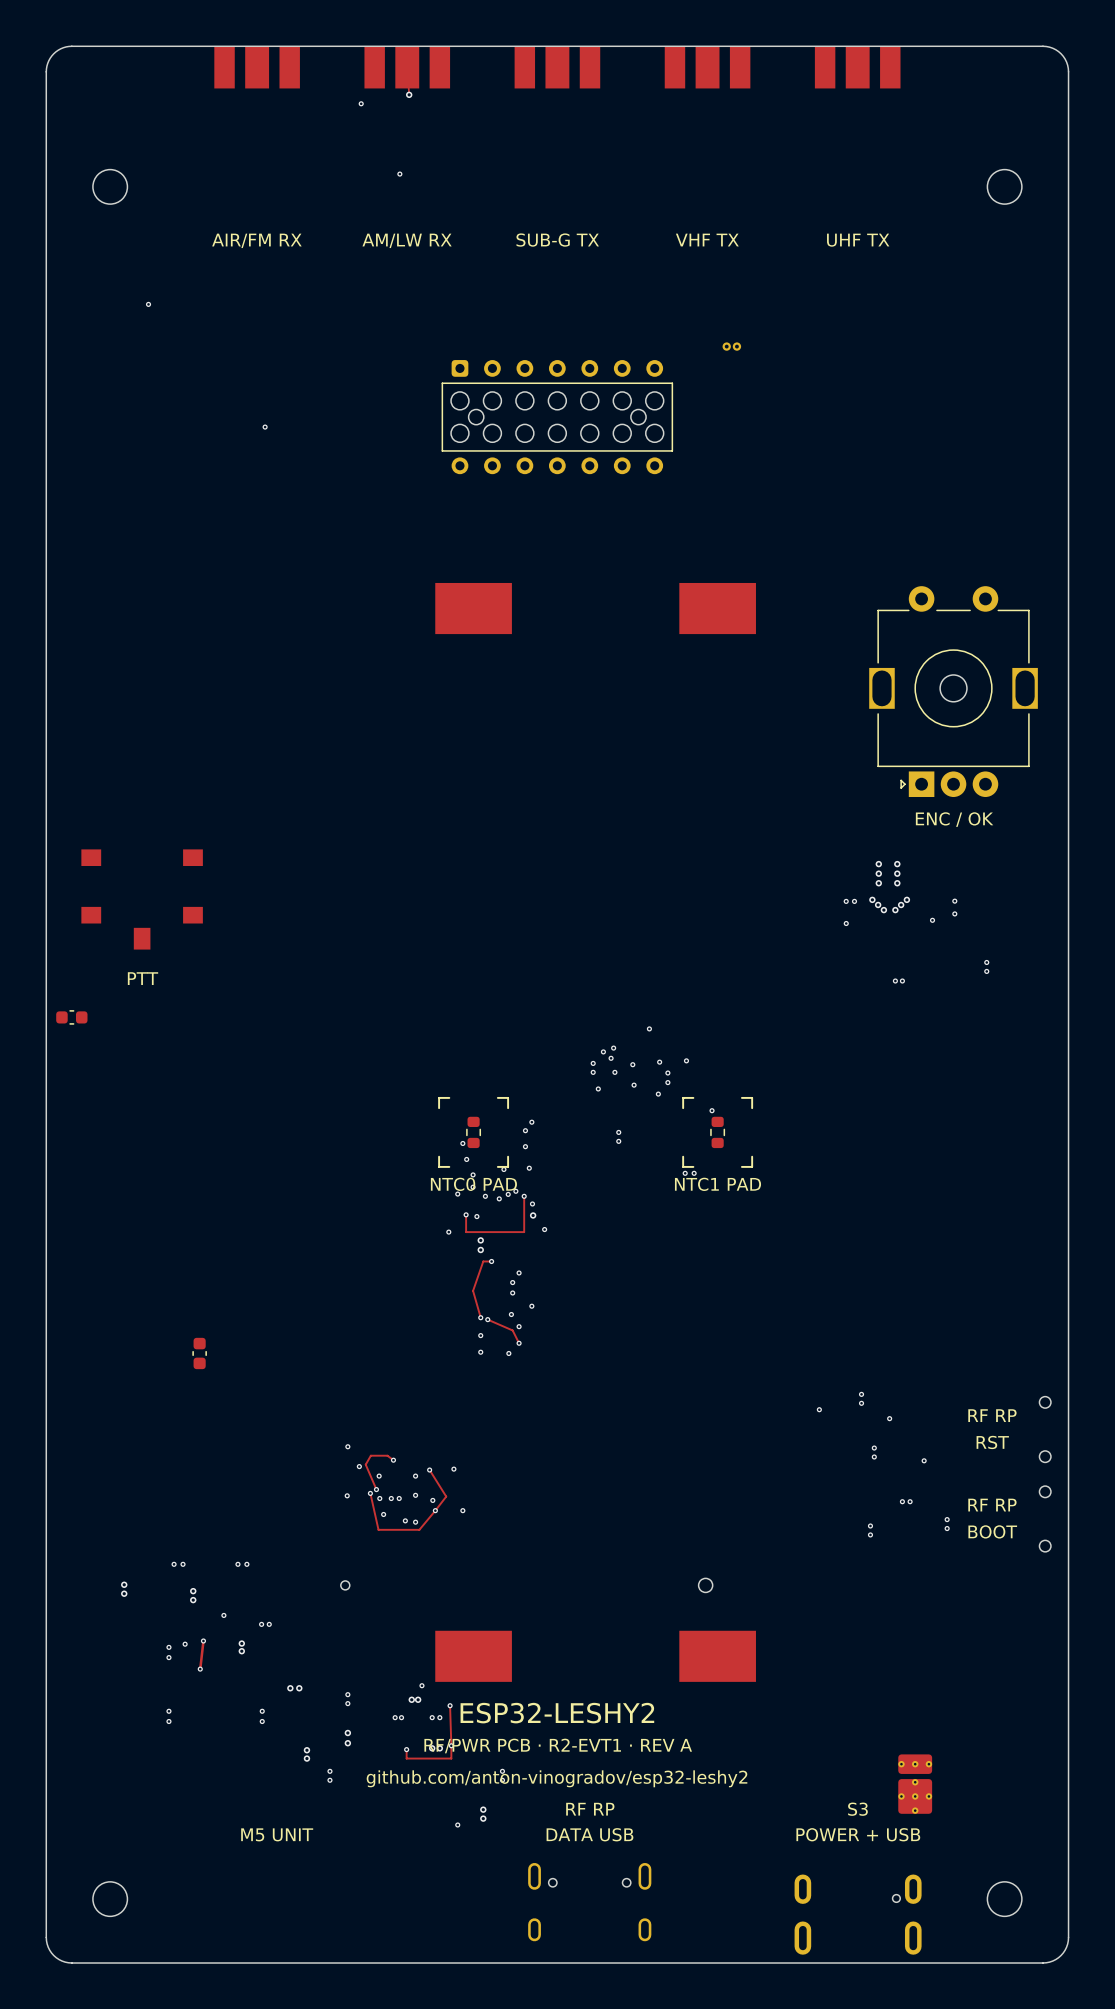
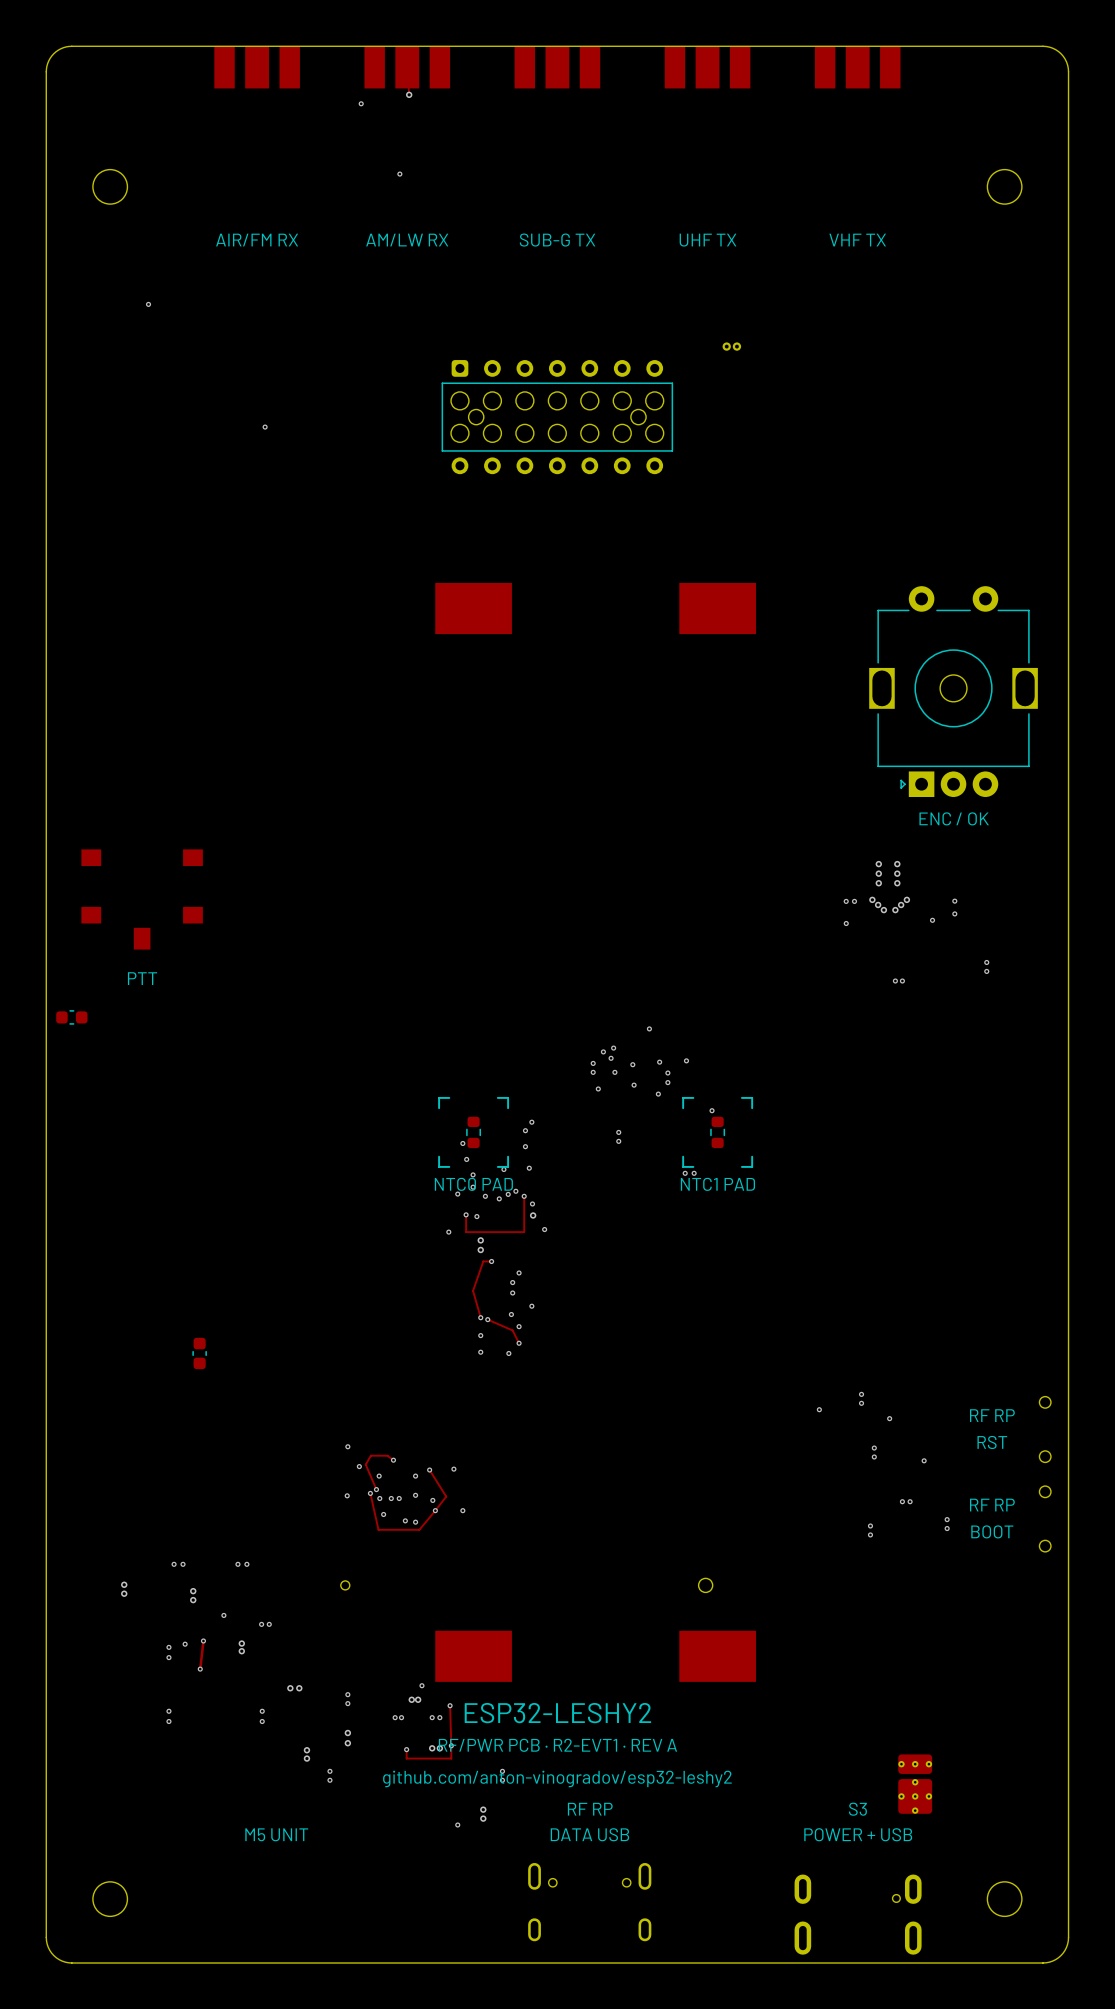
text: VHF TX (707, 240) -> UHF TX (707, 240)
text: UHF TX (858, 240) -> VHF TX (857, 240)

